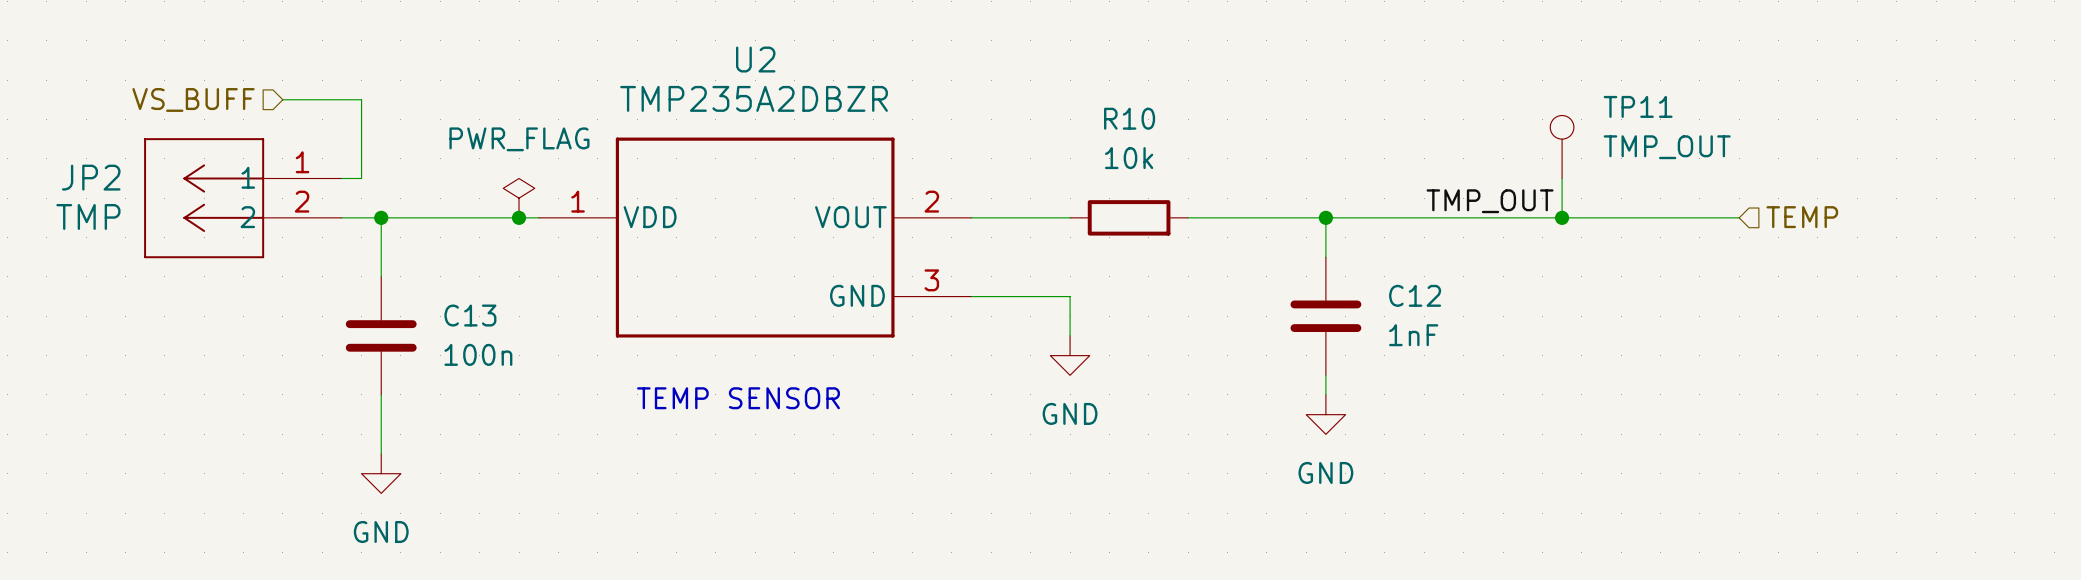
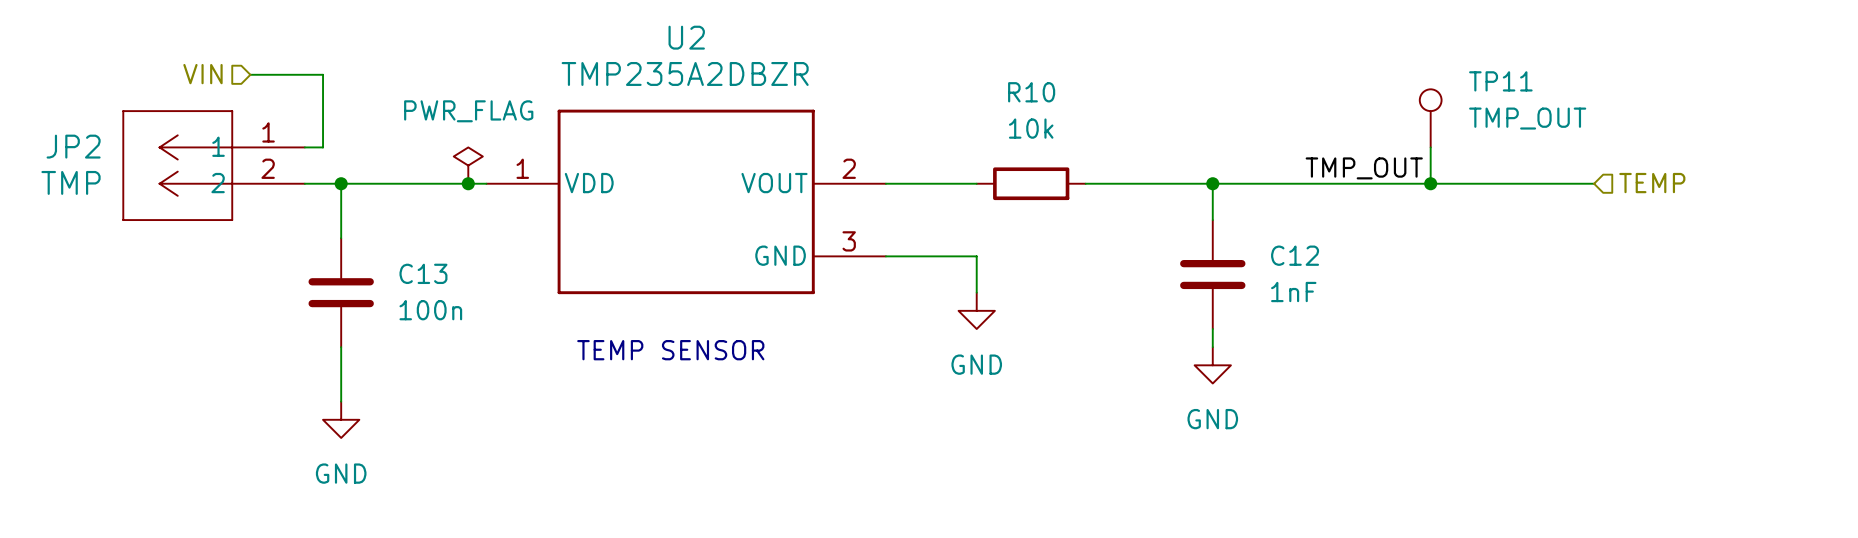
hierarchical label: VS_BUFF (193, 99) -> VIN (202, 74)

